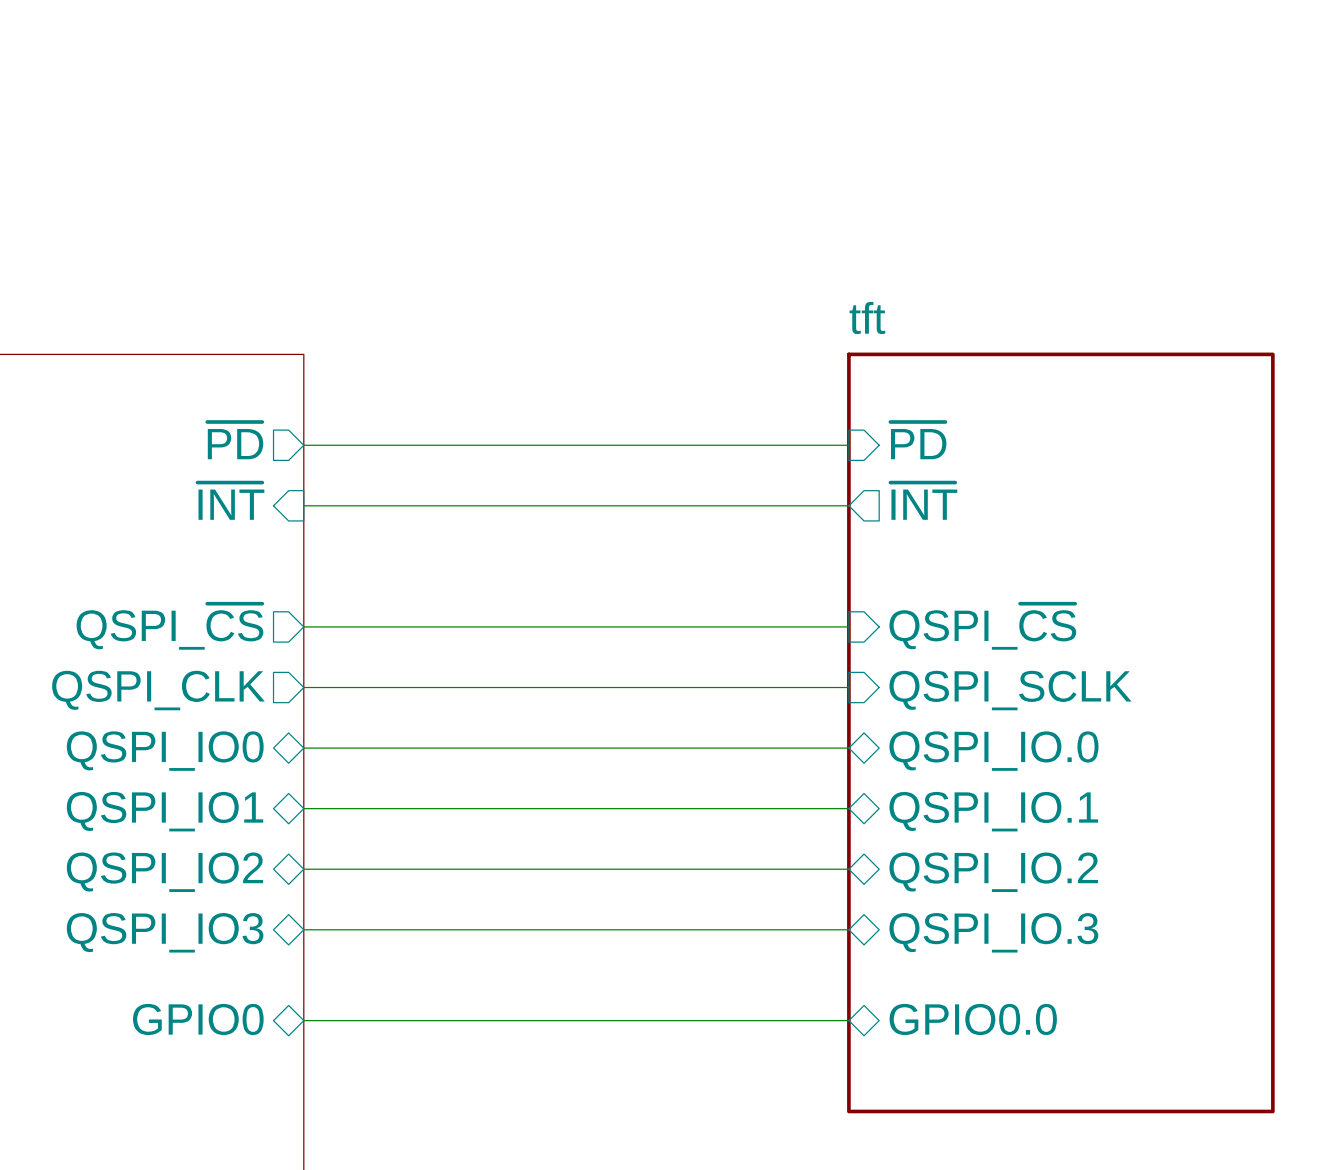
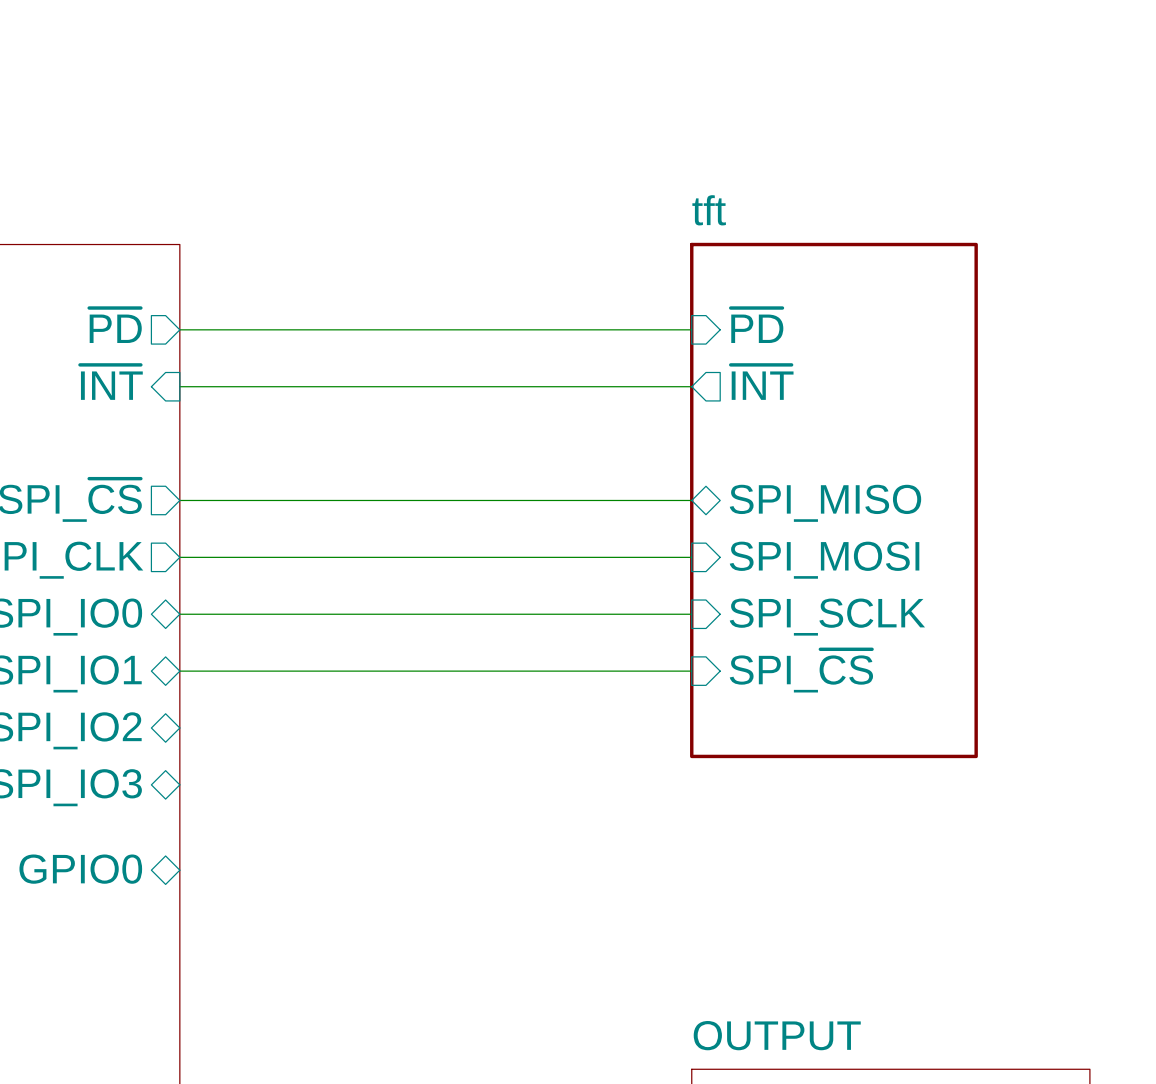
sheet pin shape: input (982, 626) -> bidirectional (825, 503)
sheet pin: QSPI_~{CS} (982, 626) -> SPI_MISO (825, 503)
sheet tft: none -> (833, 500)
sheet pin: QSPI_SCLK (1010, 690) -> SPI_MOSI (824, 560)
sheet tft: (1060, 732) -> none
sheet pin shape: bidirectional (993, 751) -> input (827, 617)
sheet pin: QSPI_IO.0 (993, 751) -> SPI_SCLK (827, 617)
sheet pin shape: bidirectional (993, 811) -> input (801, 670)
sheet pin: QSPI_IO.1 (993, 811) -> SPI_~{CS} (801, 670)
wire: (303, 869) (848, 869) -> none
sheet pin: QSPI_IO.2 (993, 872) -> none
wire: (303, 929) (848, 929) -> none
sheet pin: QSPI_IO.3 (993, 932) -> none
sheet pin: GPIO0.0 (973, 1019) -> none
wire: (303, 1020) (848, 1020) -> none

